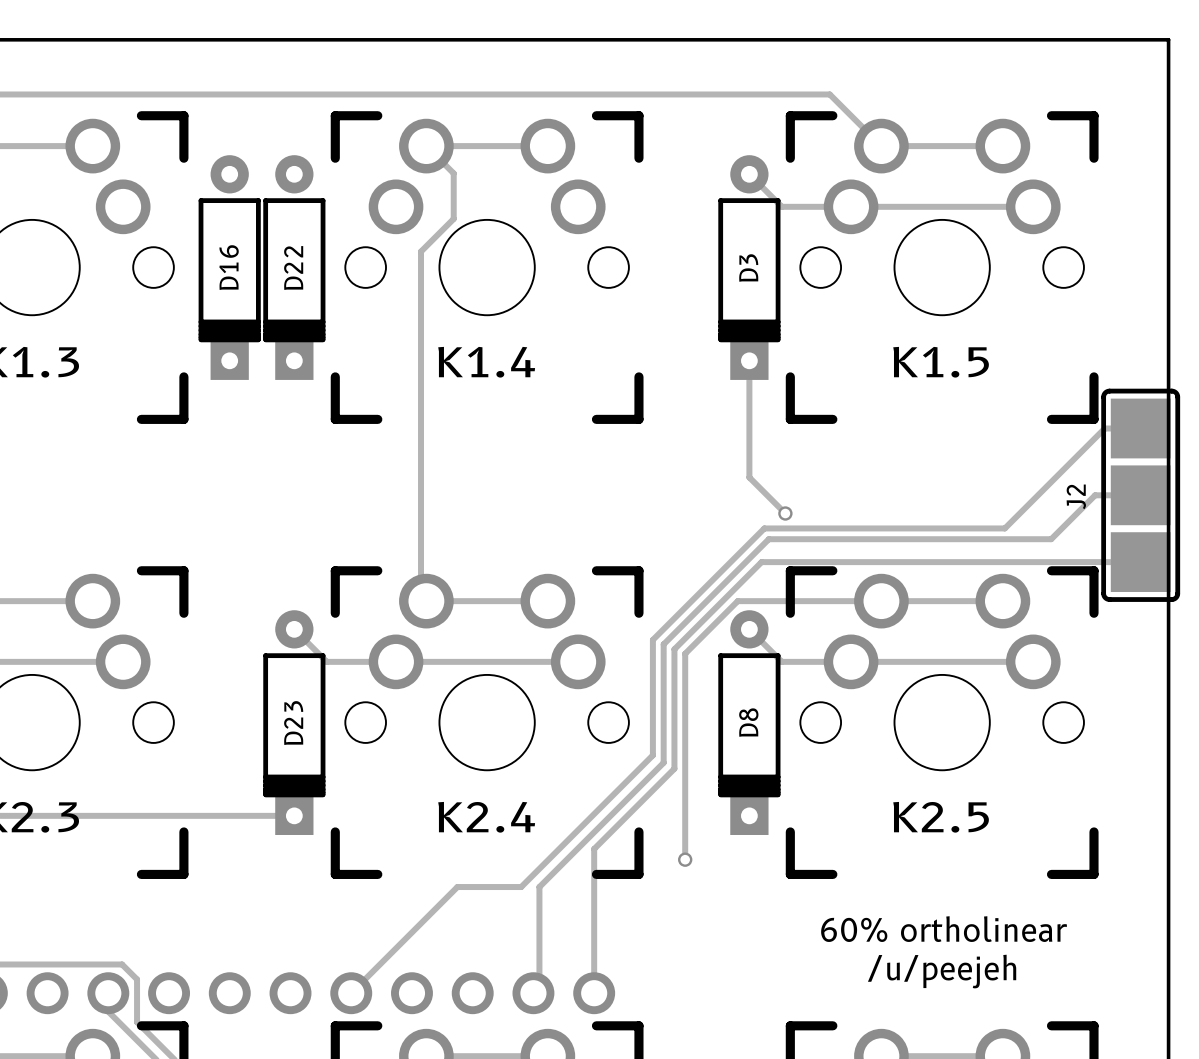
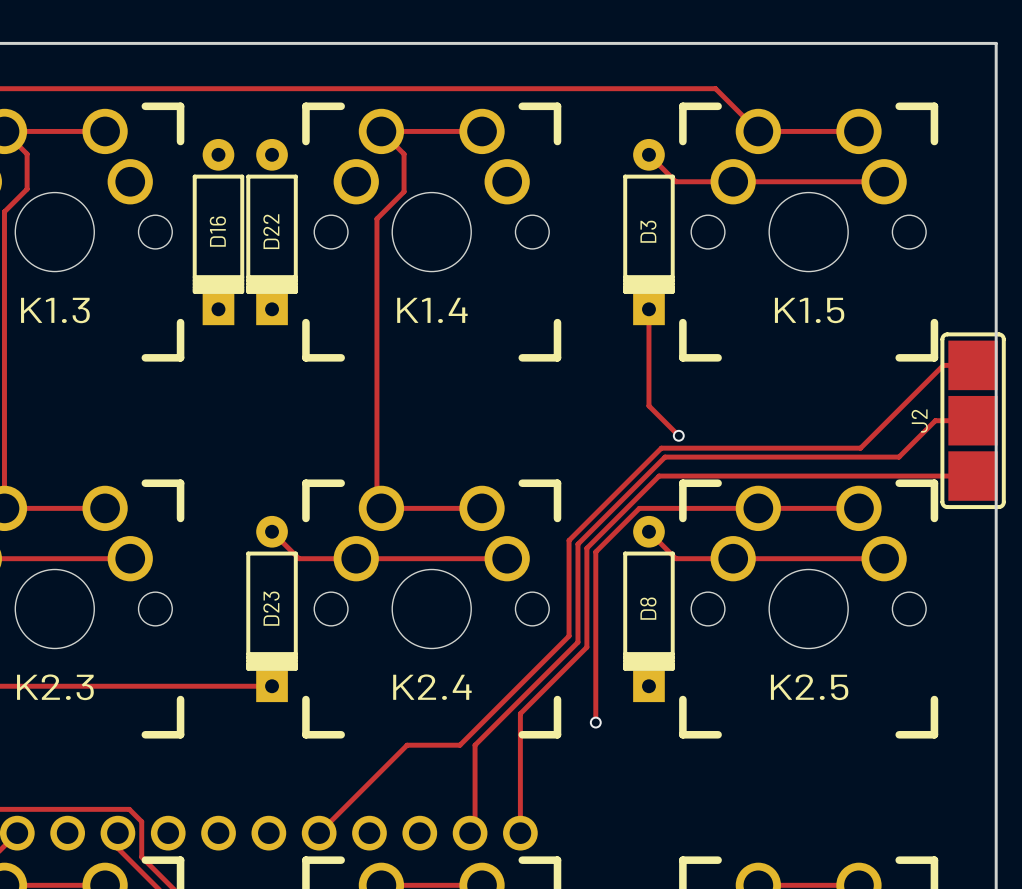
text: 60% ortholinear (944, 929) -> none
text: /u/peejeh (942, 971) -> none

